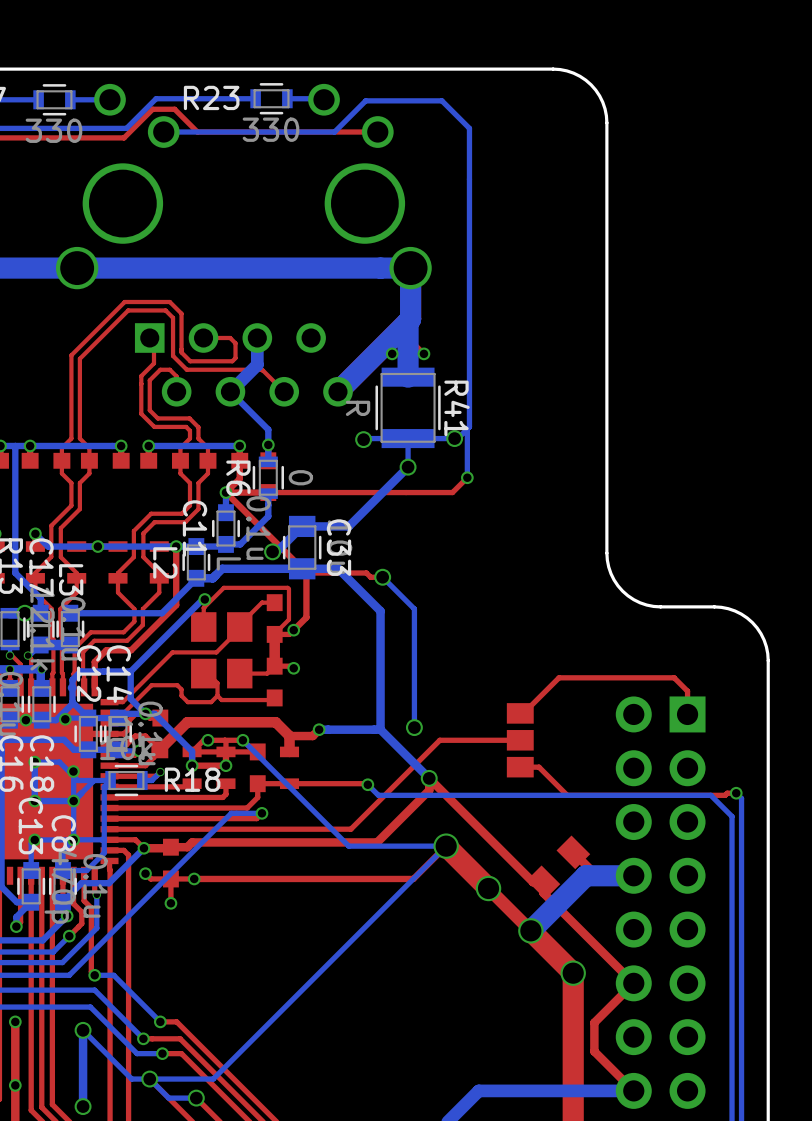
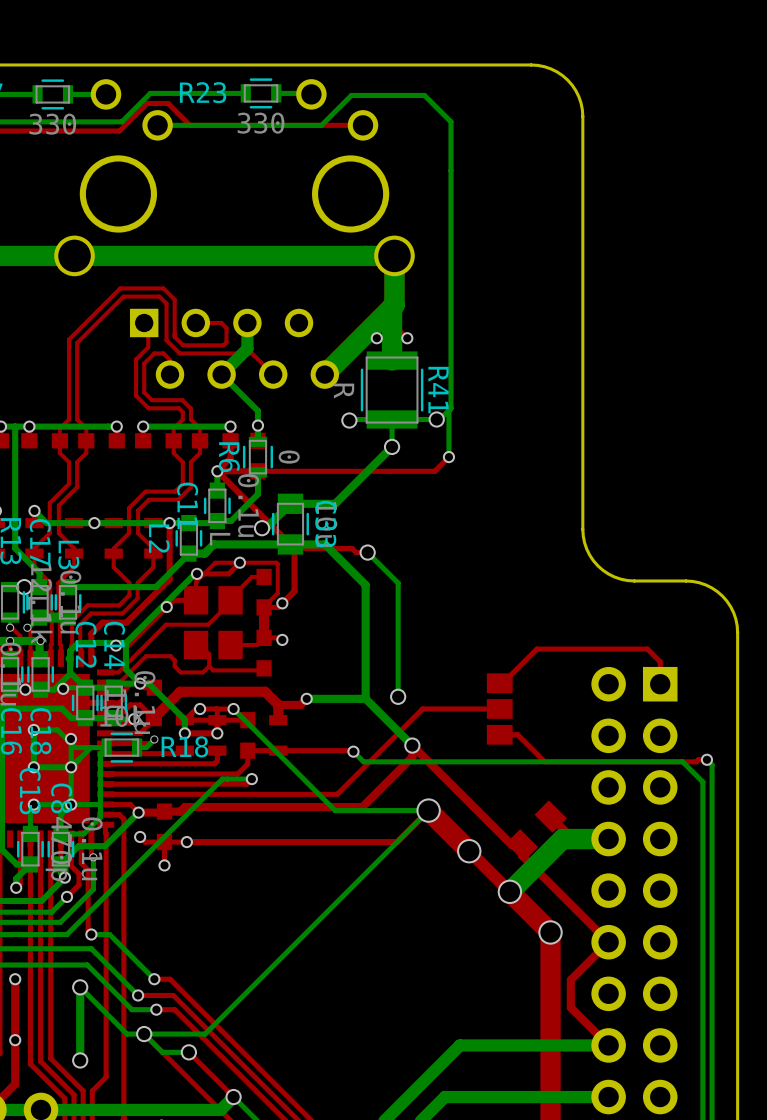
top track: none -> (239, 562) (228, 573) (197, 573)
via: none -> (239, 562)
top track: none -> (196, 600) (173, 600) (128, 645) (115, 645)
via: none -> (166, 607)
via: none -> (115, 645)

